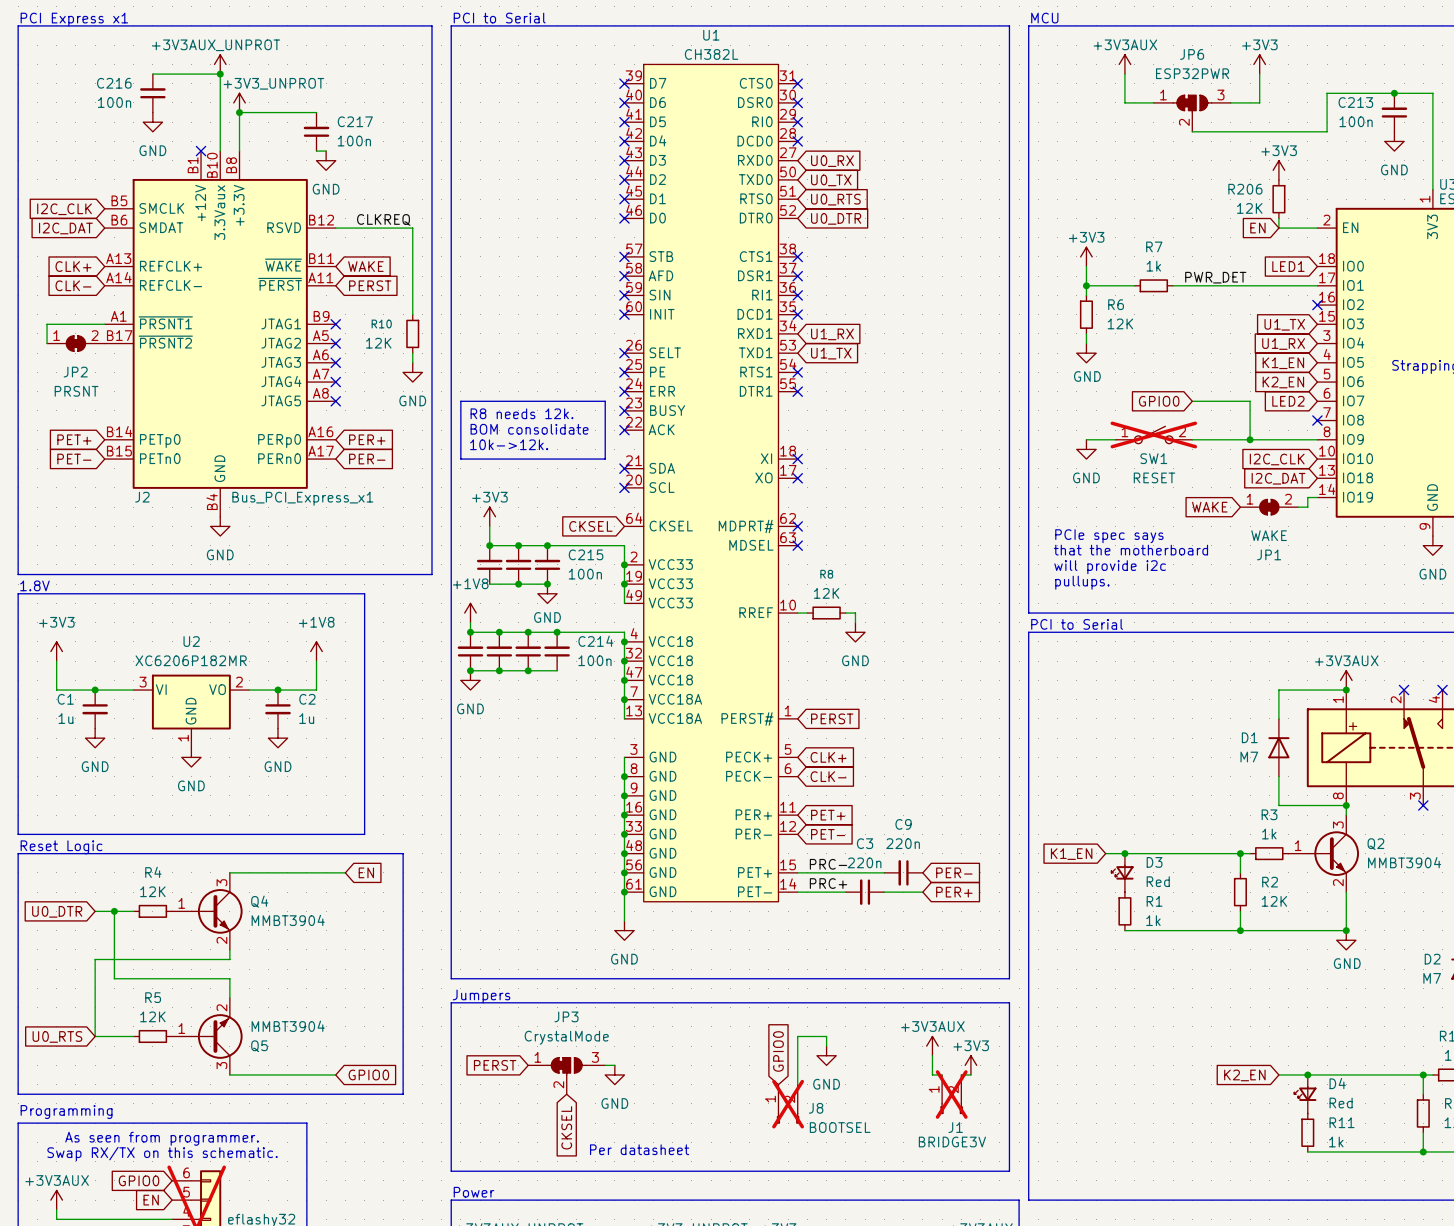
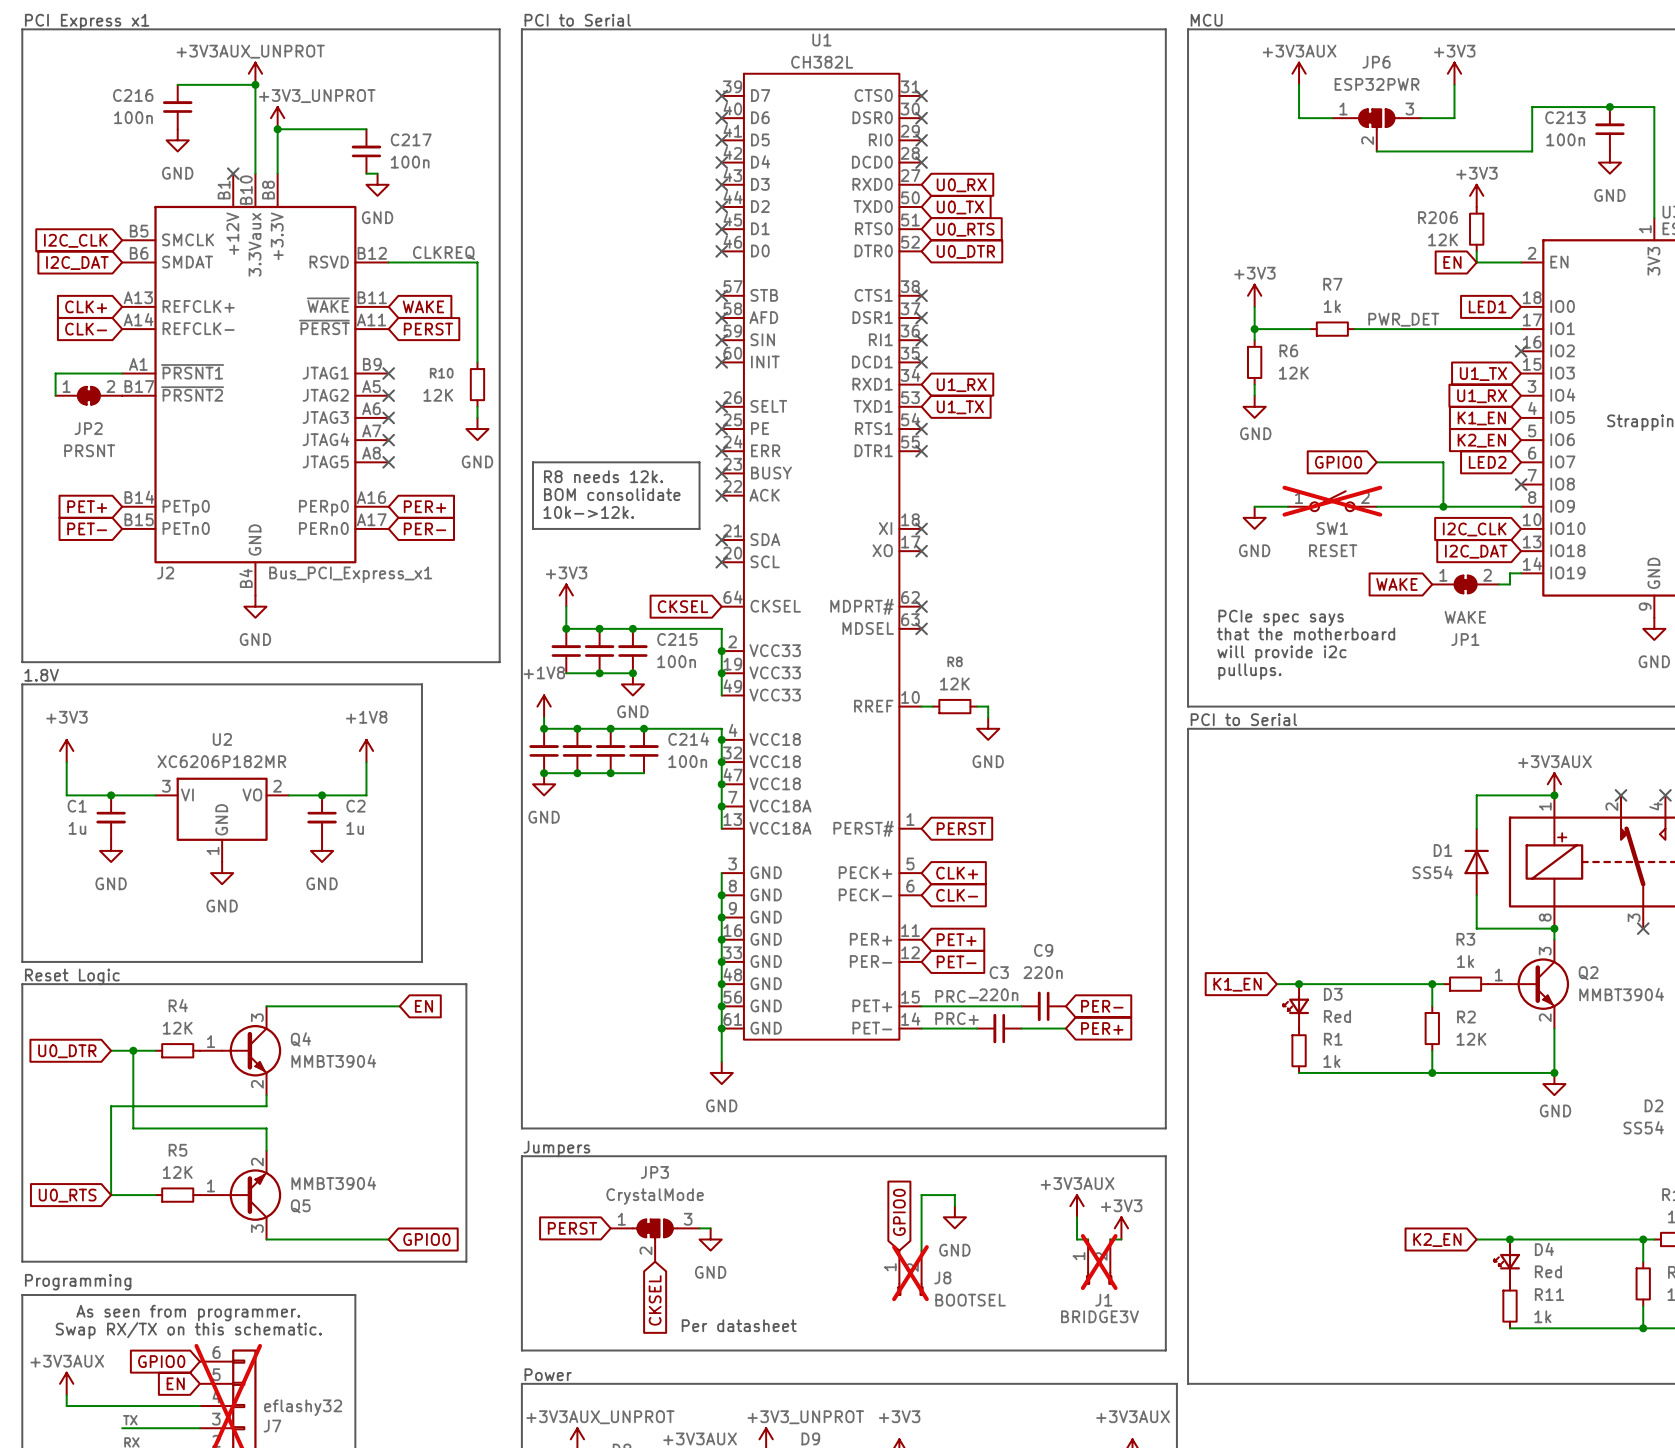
D1 value: M7 (1249, 757) -> SS54 (1432, 872)
D2 value: M7 (1432, 978) -> SS54 (1643, 1127)

